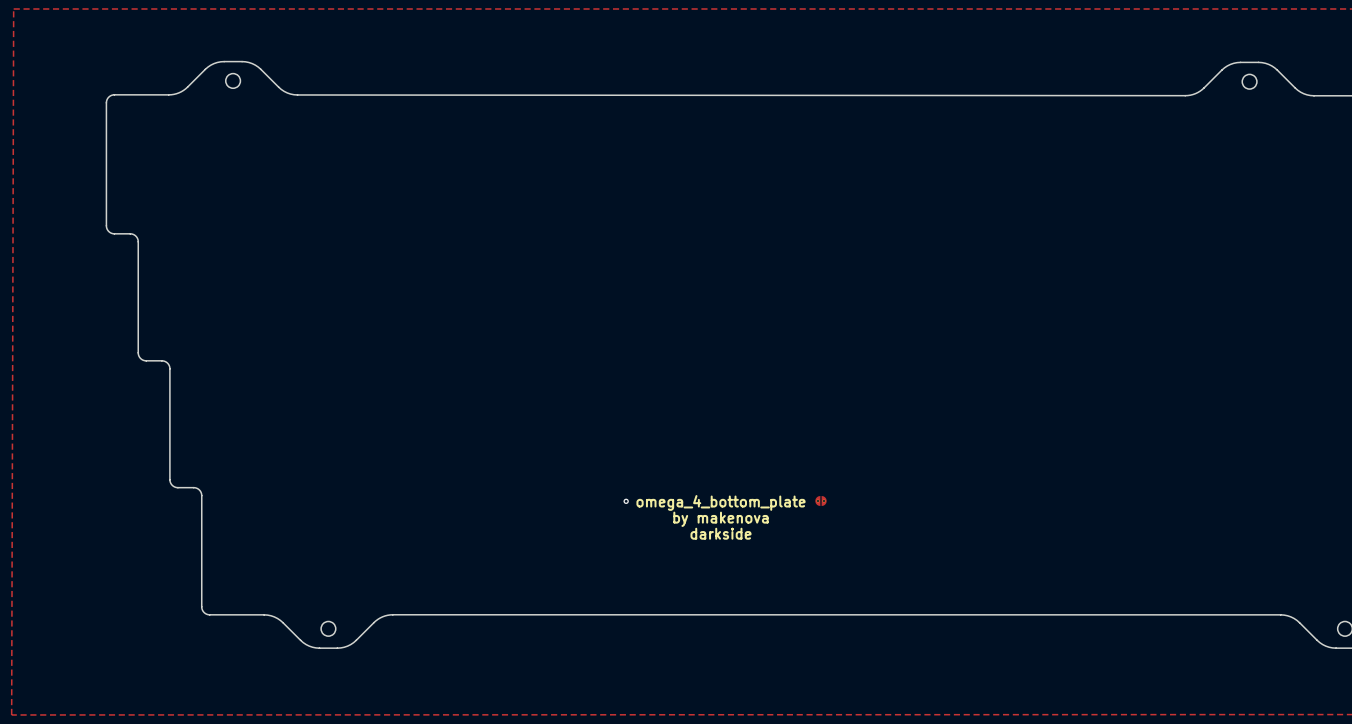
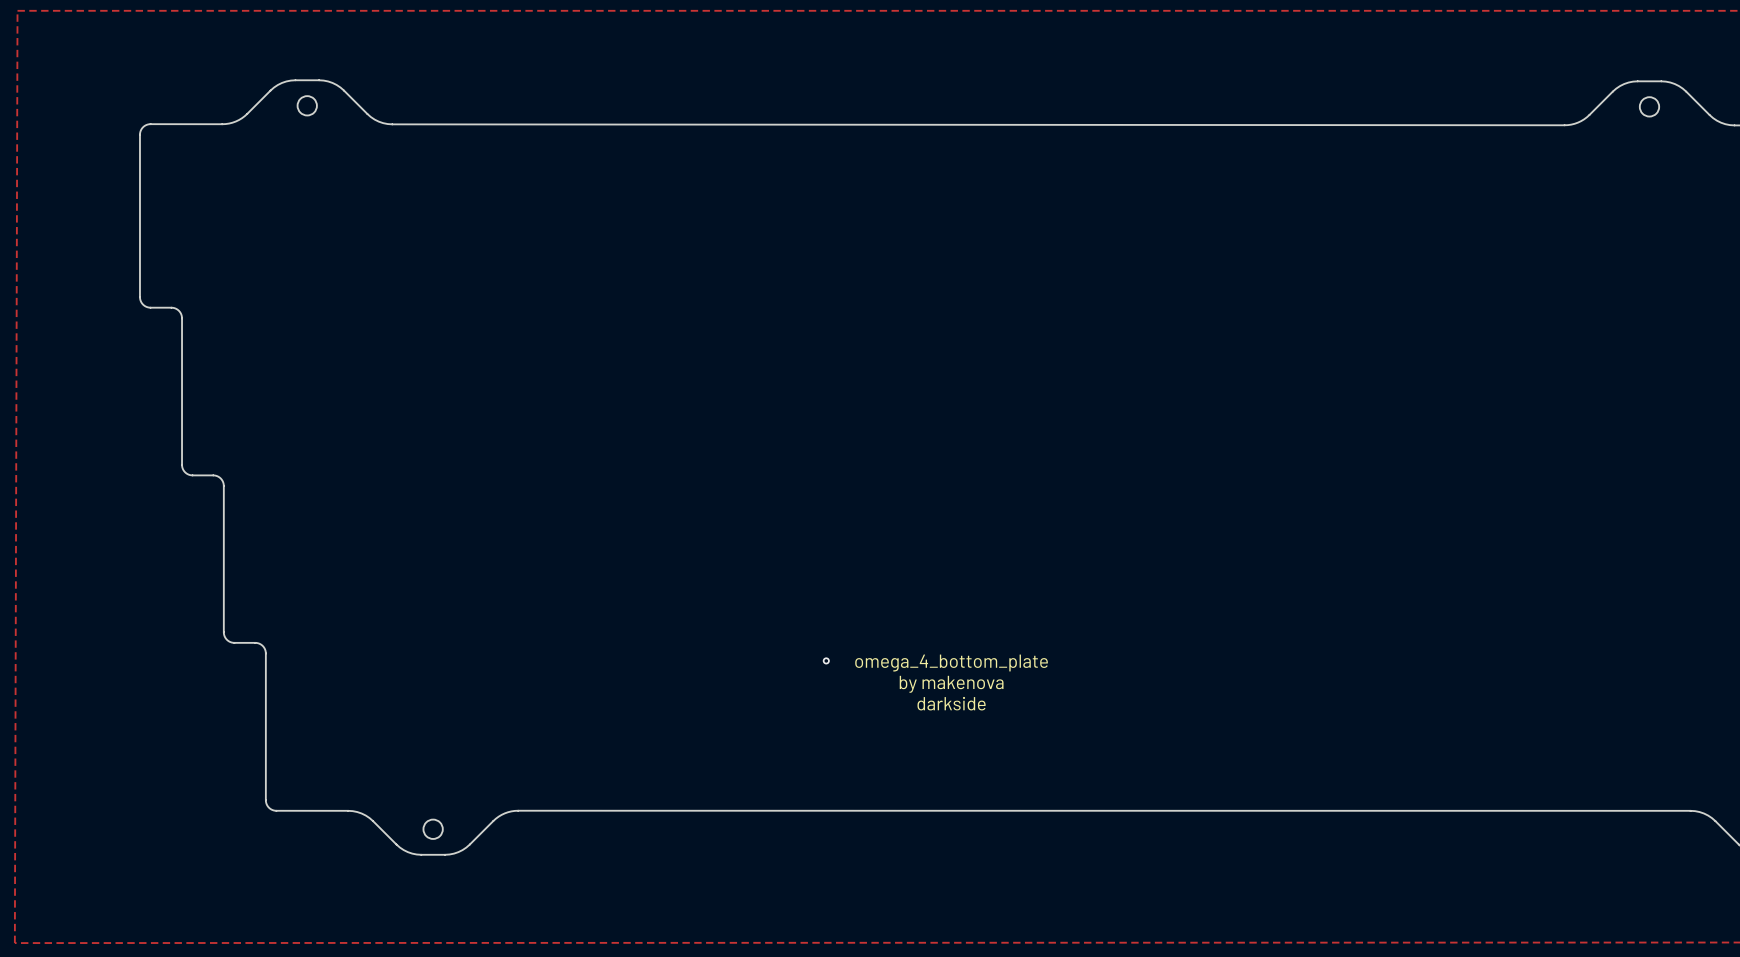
part: (820, 500) -> none

